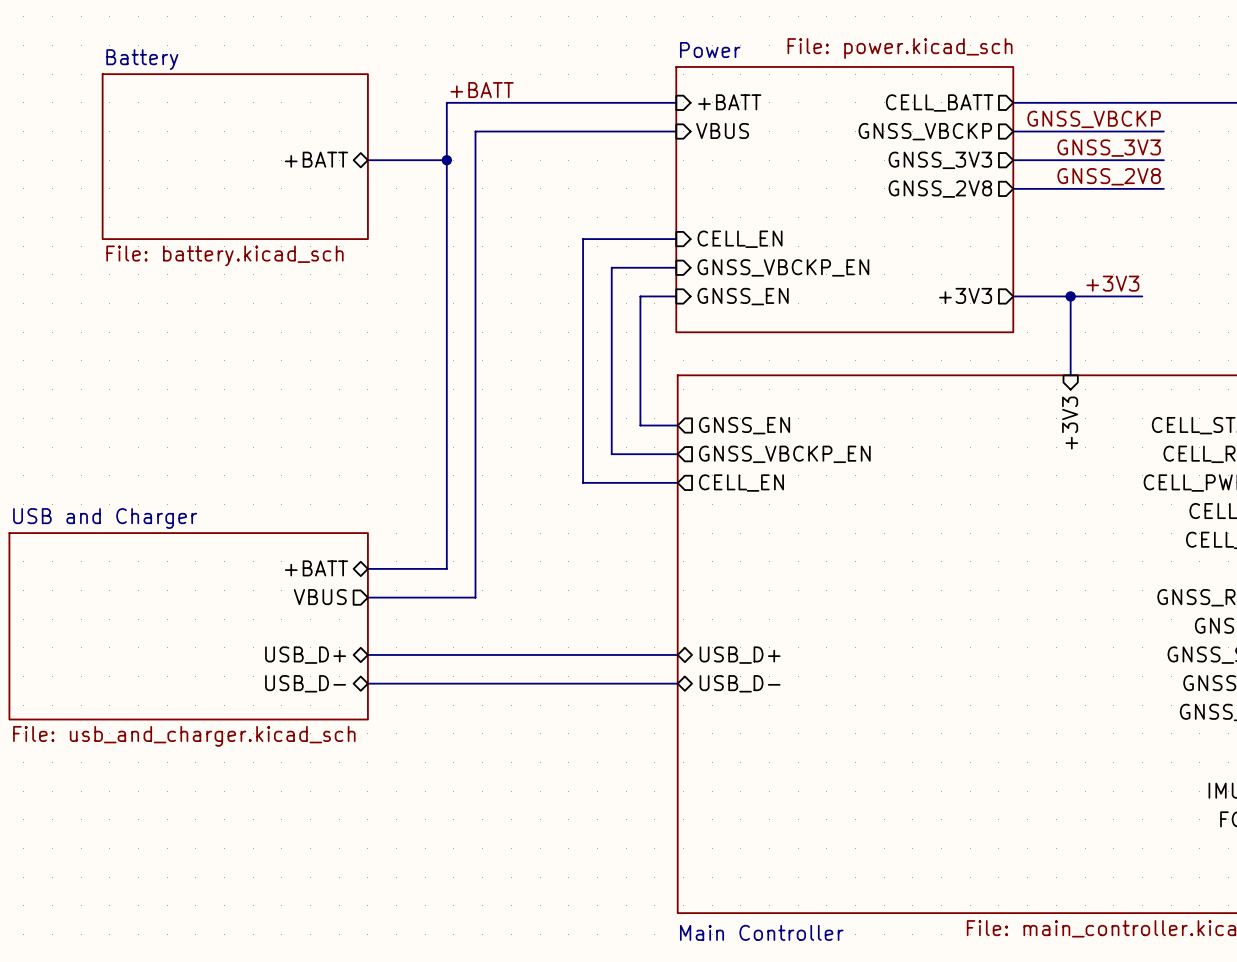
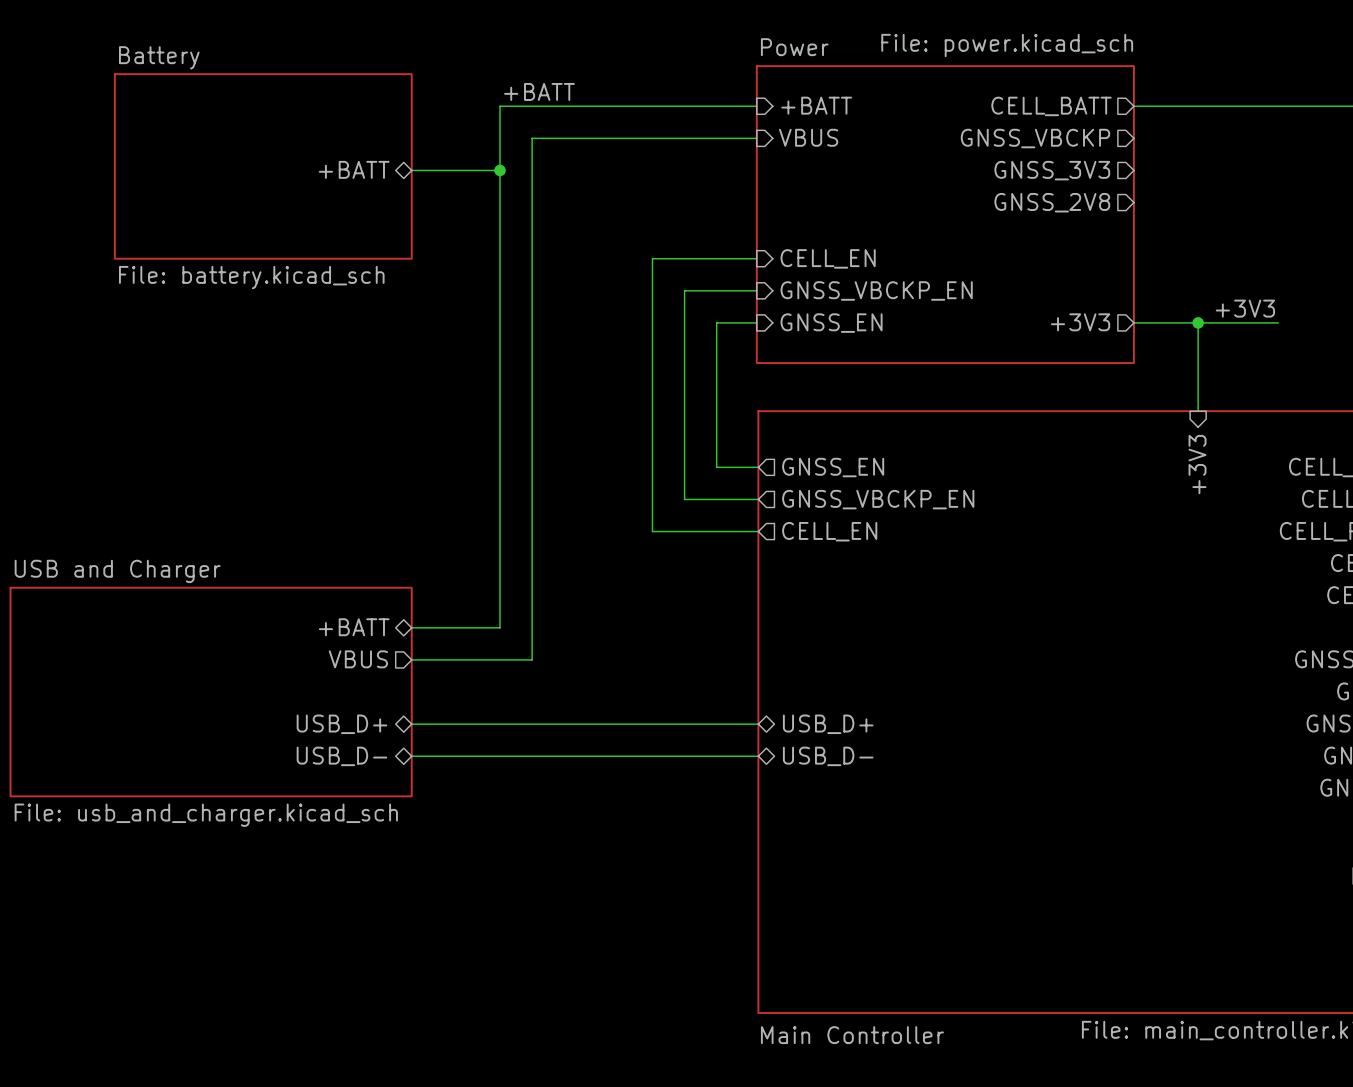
label: GNSS_VBCKP (1094, 119) -> none
wire: (1013, 131) (1163, 131) -> none
label: GNSS_3V3 (1109, 148) -> none
wire: (1013, 160) (1163, 160) -> none
label: GNSS_2V8 (1109, 176) -> none
wire: (1013, 188) (1163, 188) -> none

